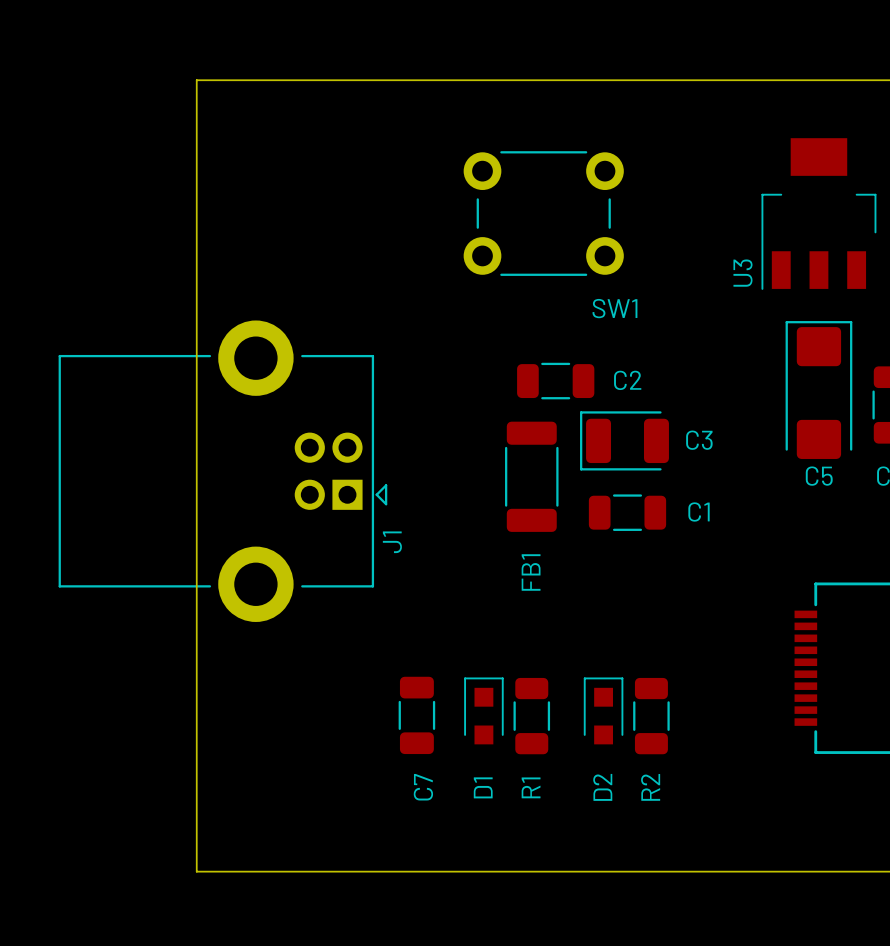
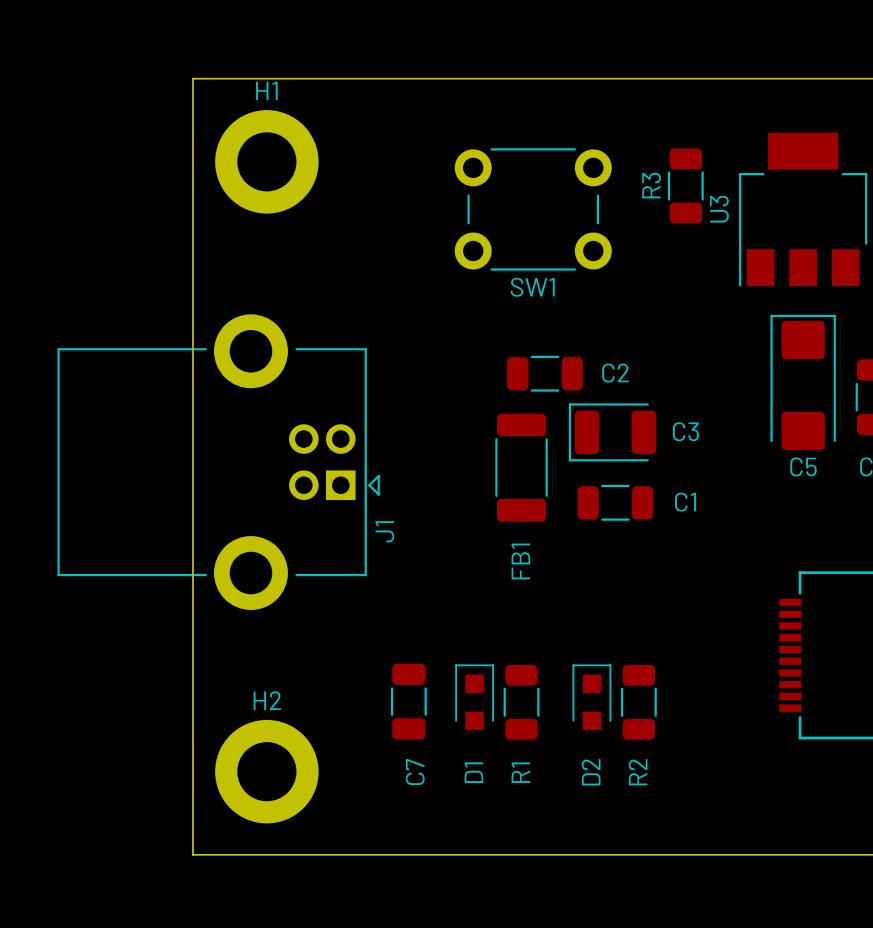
U3 footprint: [761, 138, 877, 290] -> [739, 132, 868, 287]
H1: none -> (266, 161)
R3: none -> (685, 185)
U3 name position: U3 (742, 273) -> U3 (719, 209)
SW1 name position: SW1 (614, 308) -> SW1 (532, 287)
H2: none -> (266, 771)

